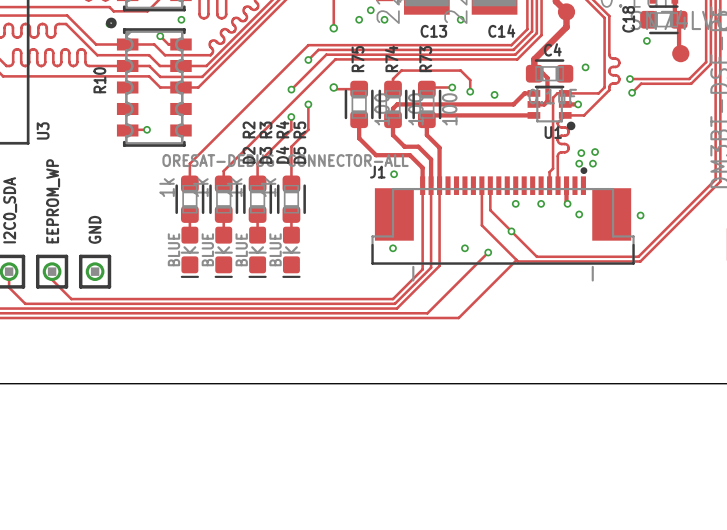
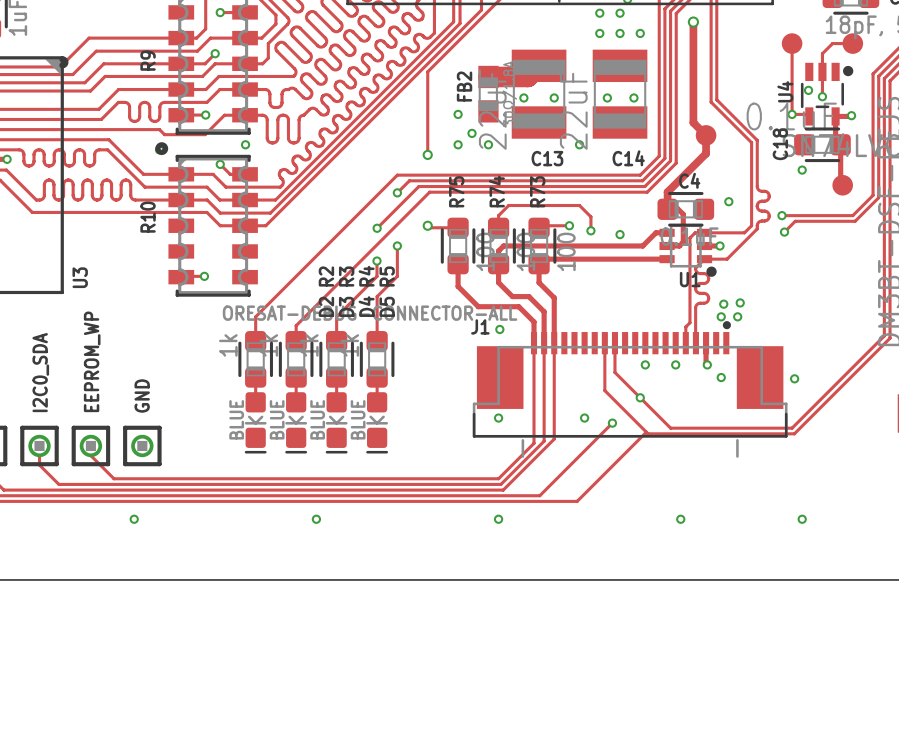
via: none -> (134, 519)
via: none -> (316, 519)
via: none -> (498, 519)
via: none -> (680, 519)
via: none -> (802, 519)

